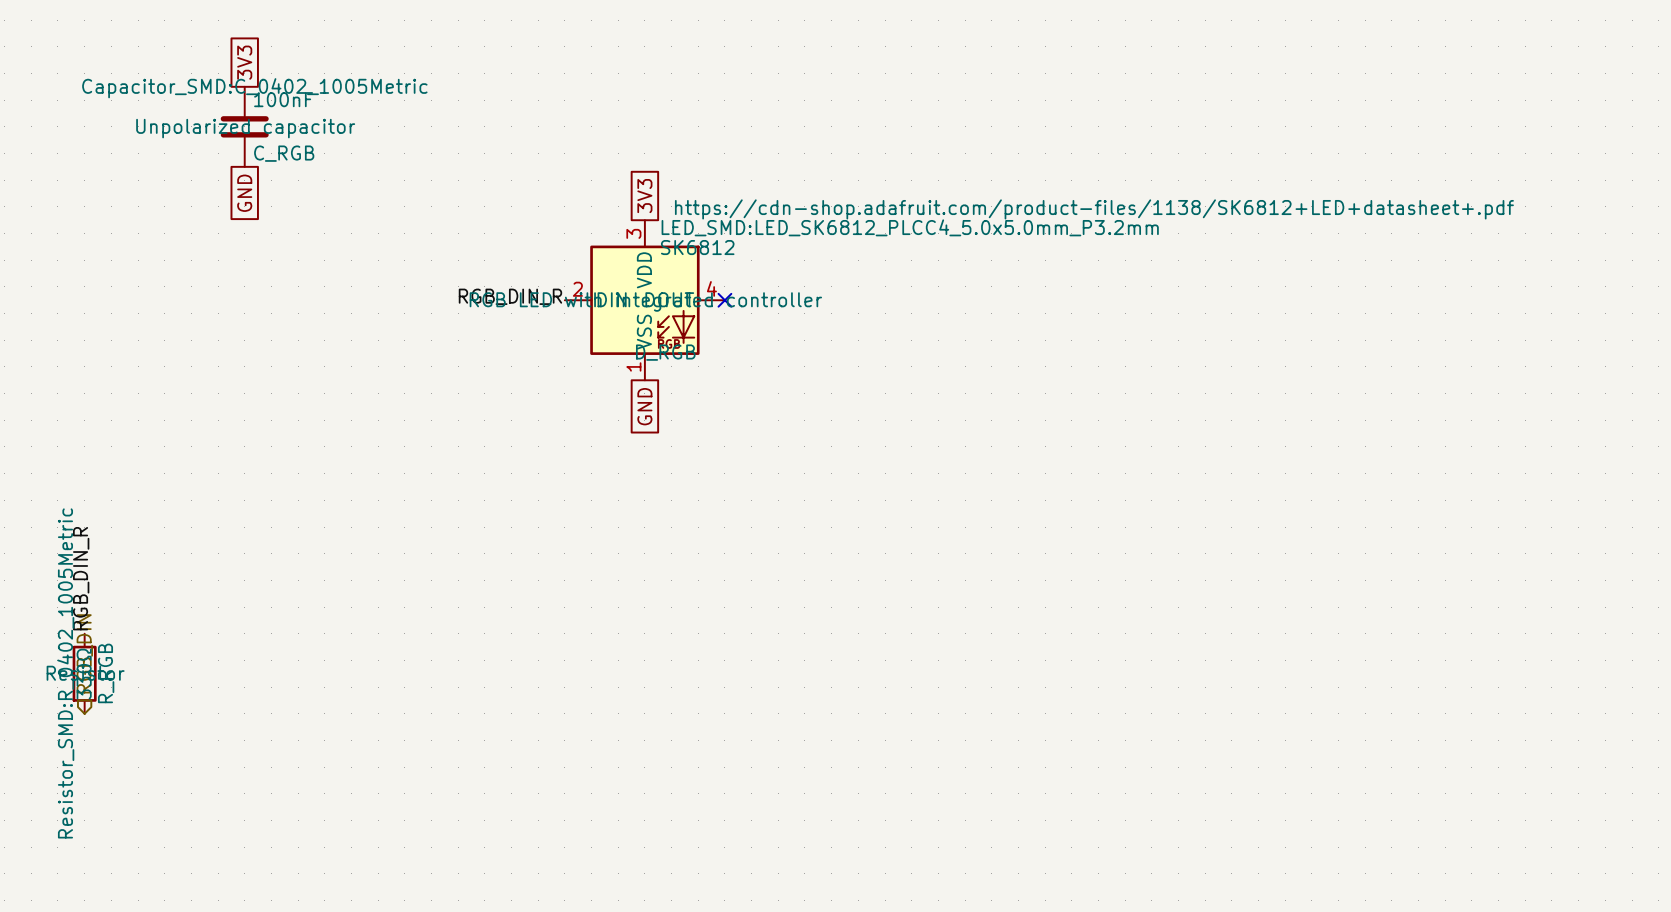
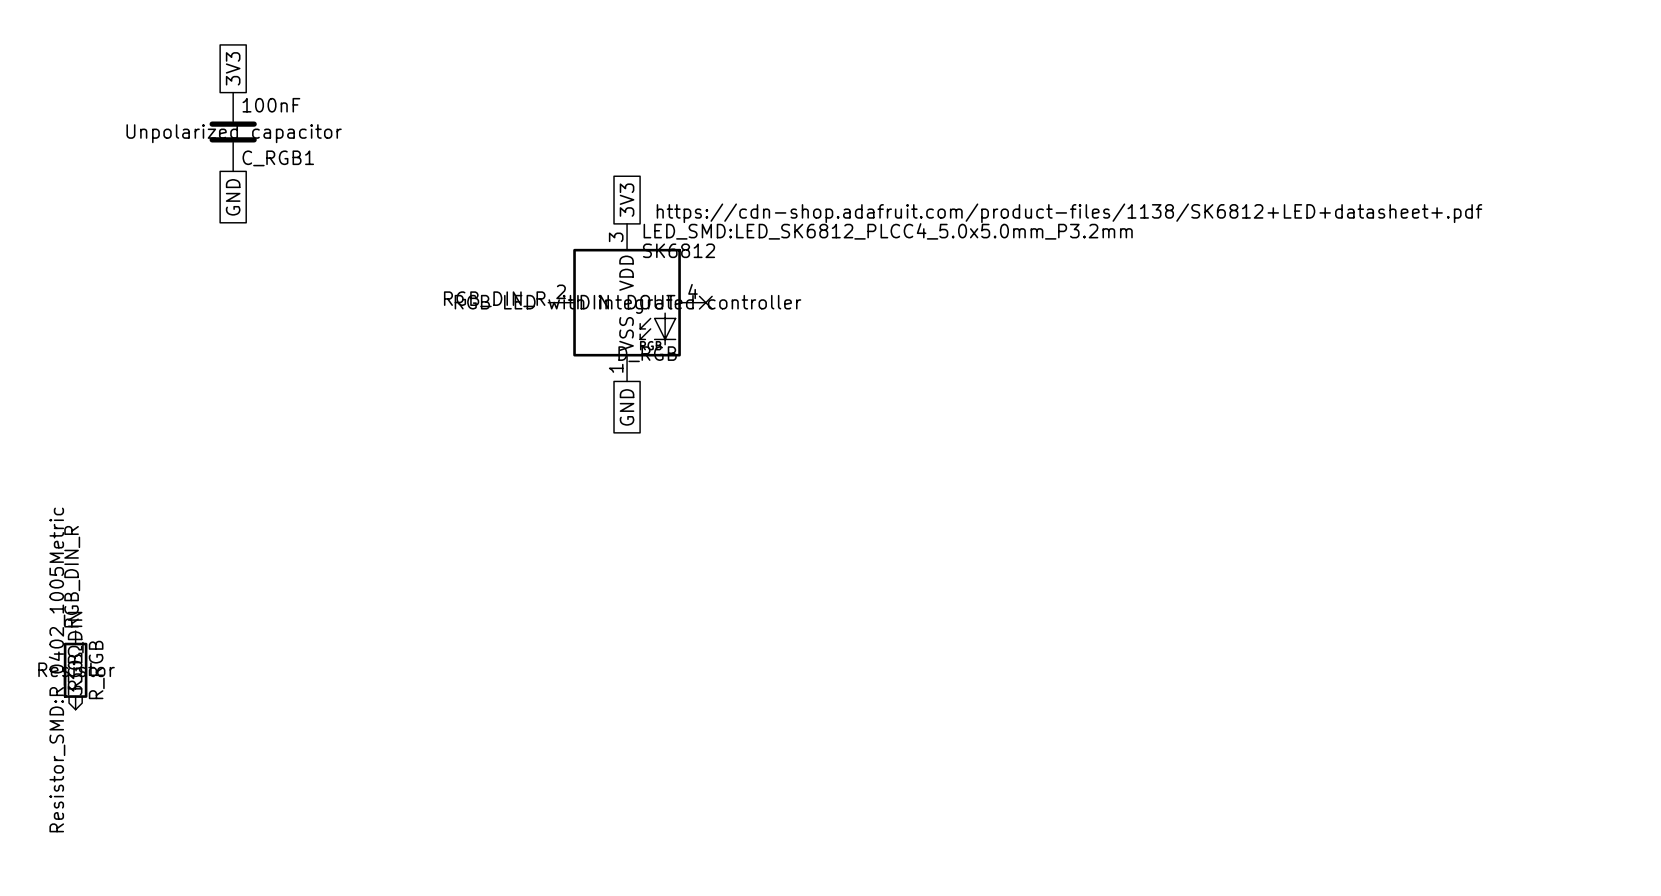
C_RGB text: Capacitor_SMD:C_0402_1005Metric (254, 88) -> none
C_RGB name: C_RGB (284, 153) -> C_RGB1 (278, 158)

